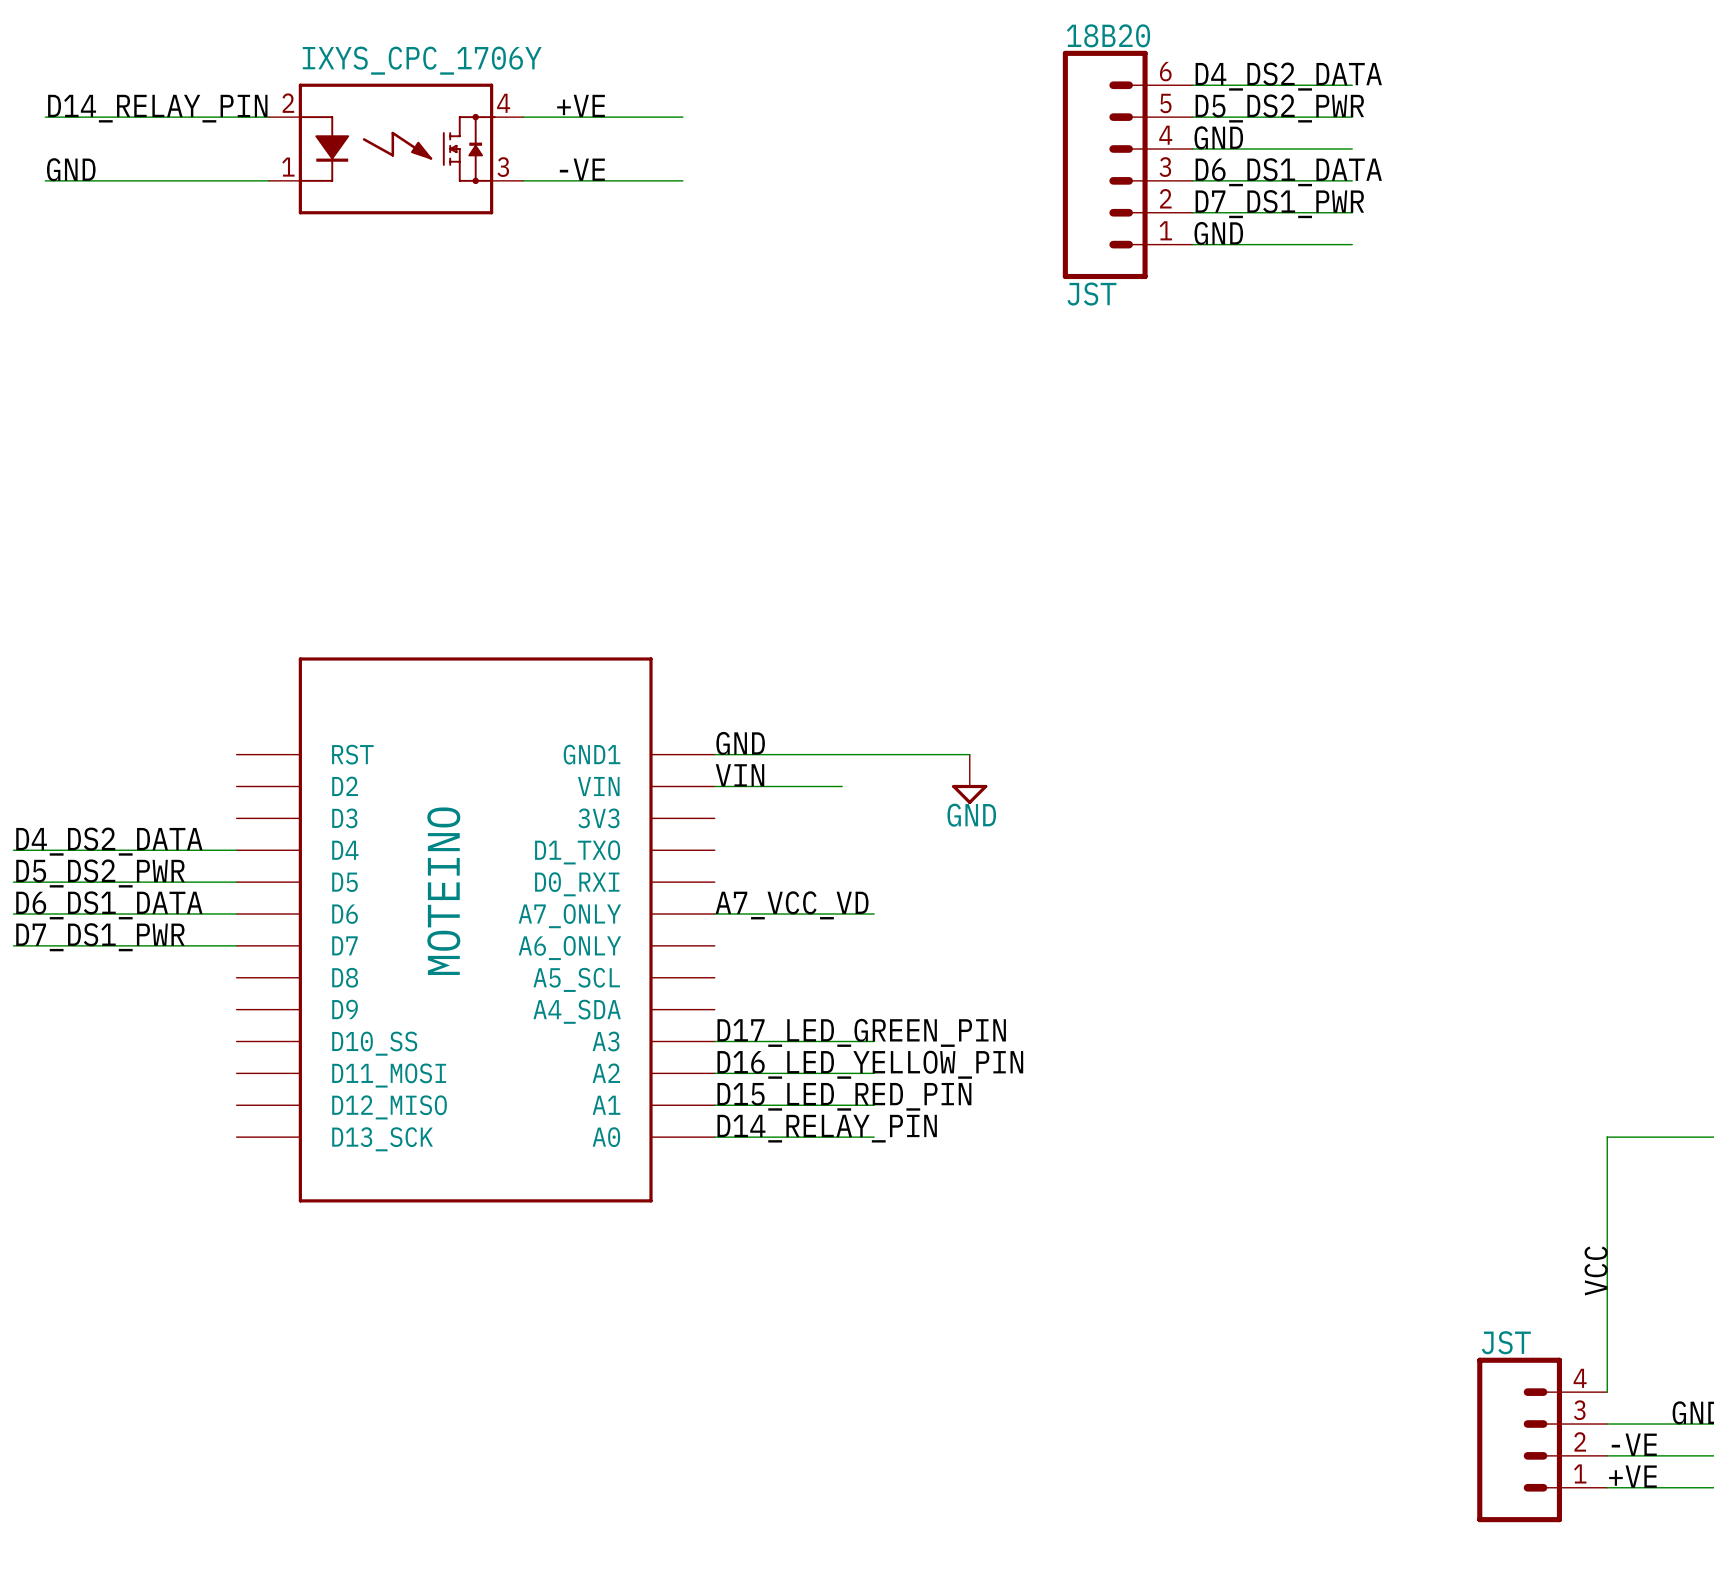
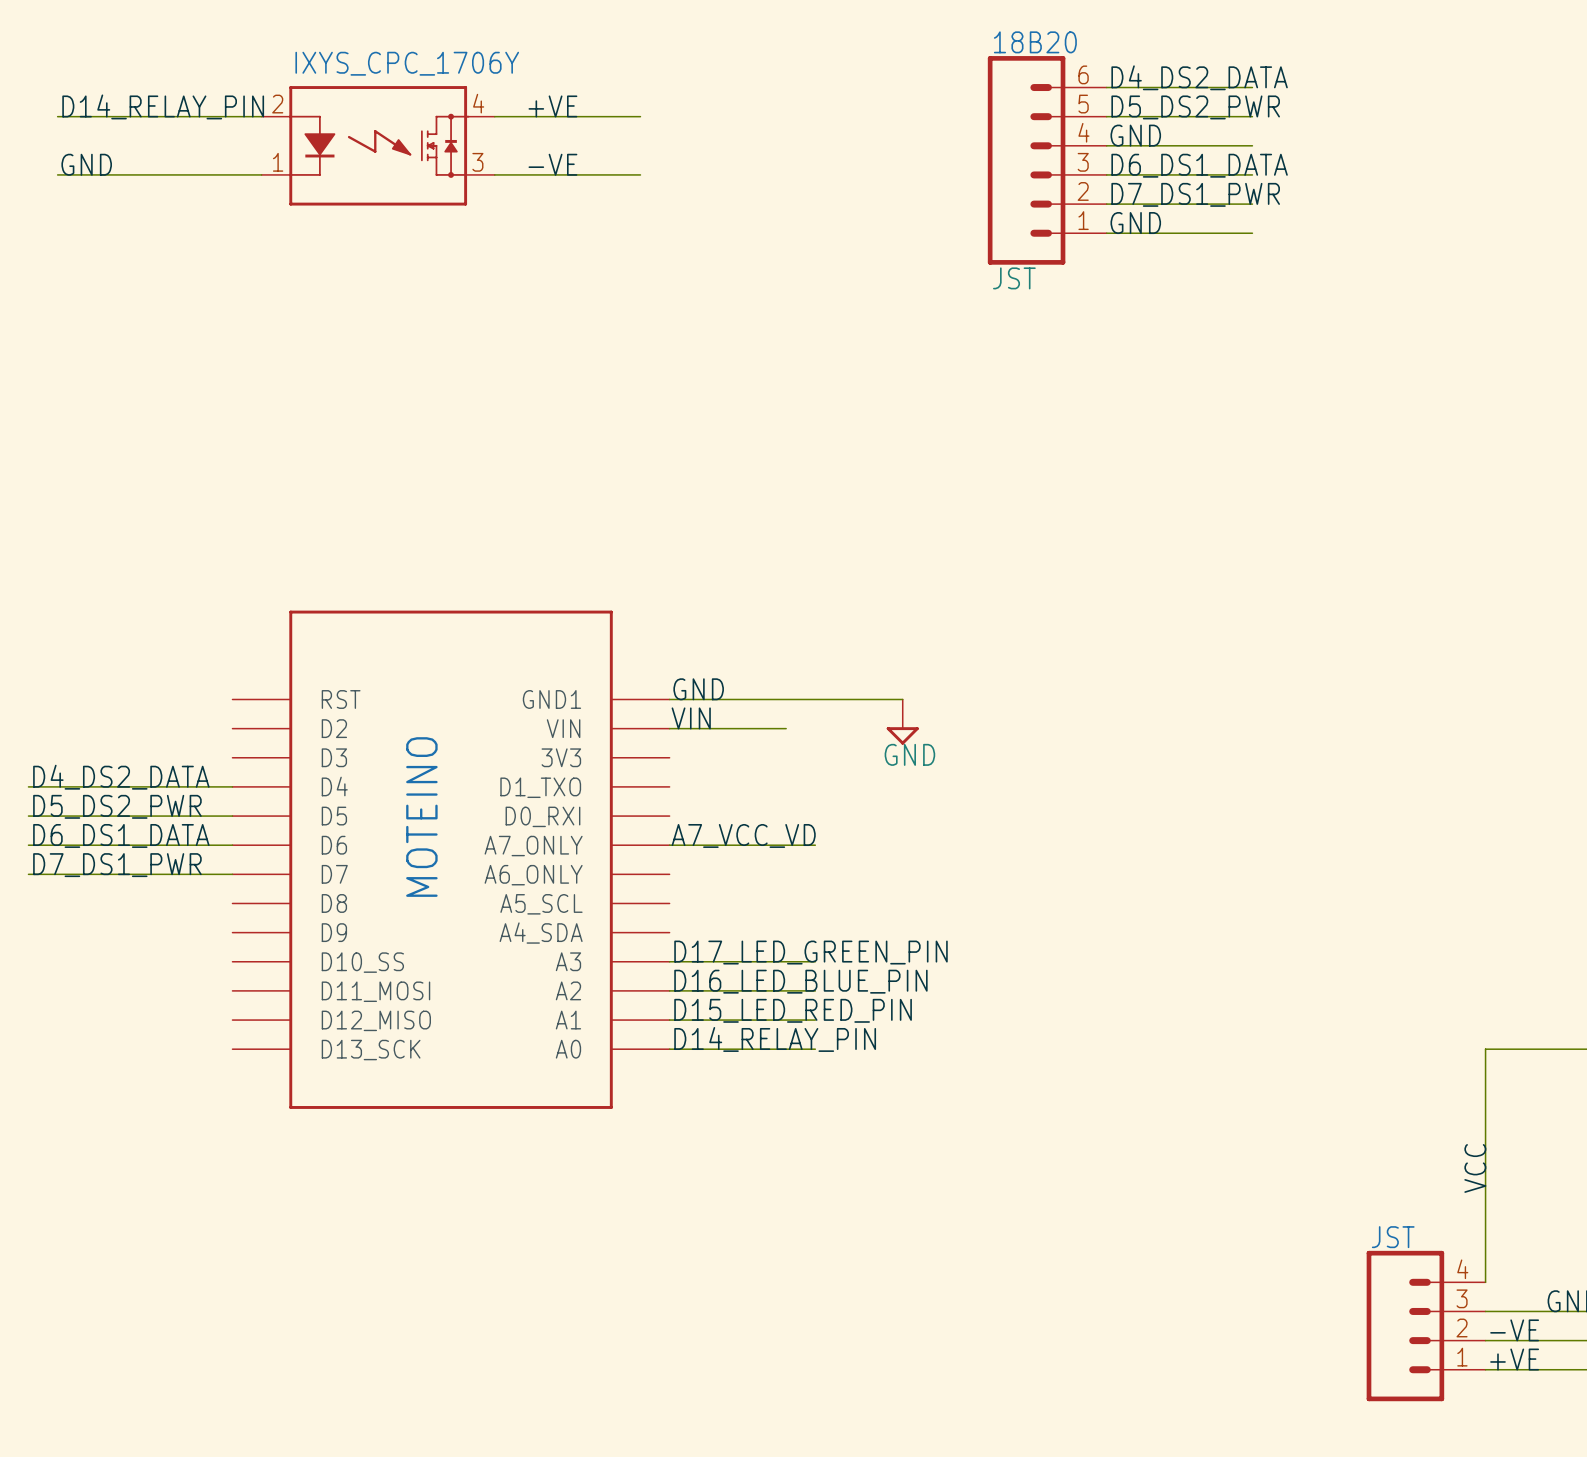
label: D16_LED_YELLOW_PIN (870, 1064) -> D16_LED_BLUE_PIN (800, 981)

